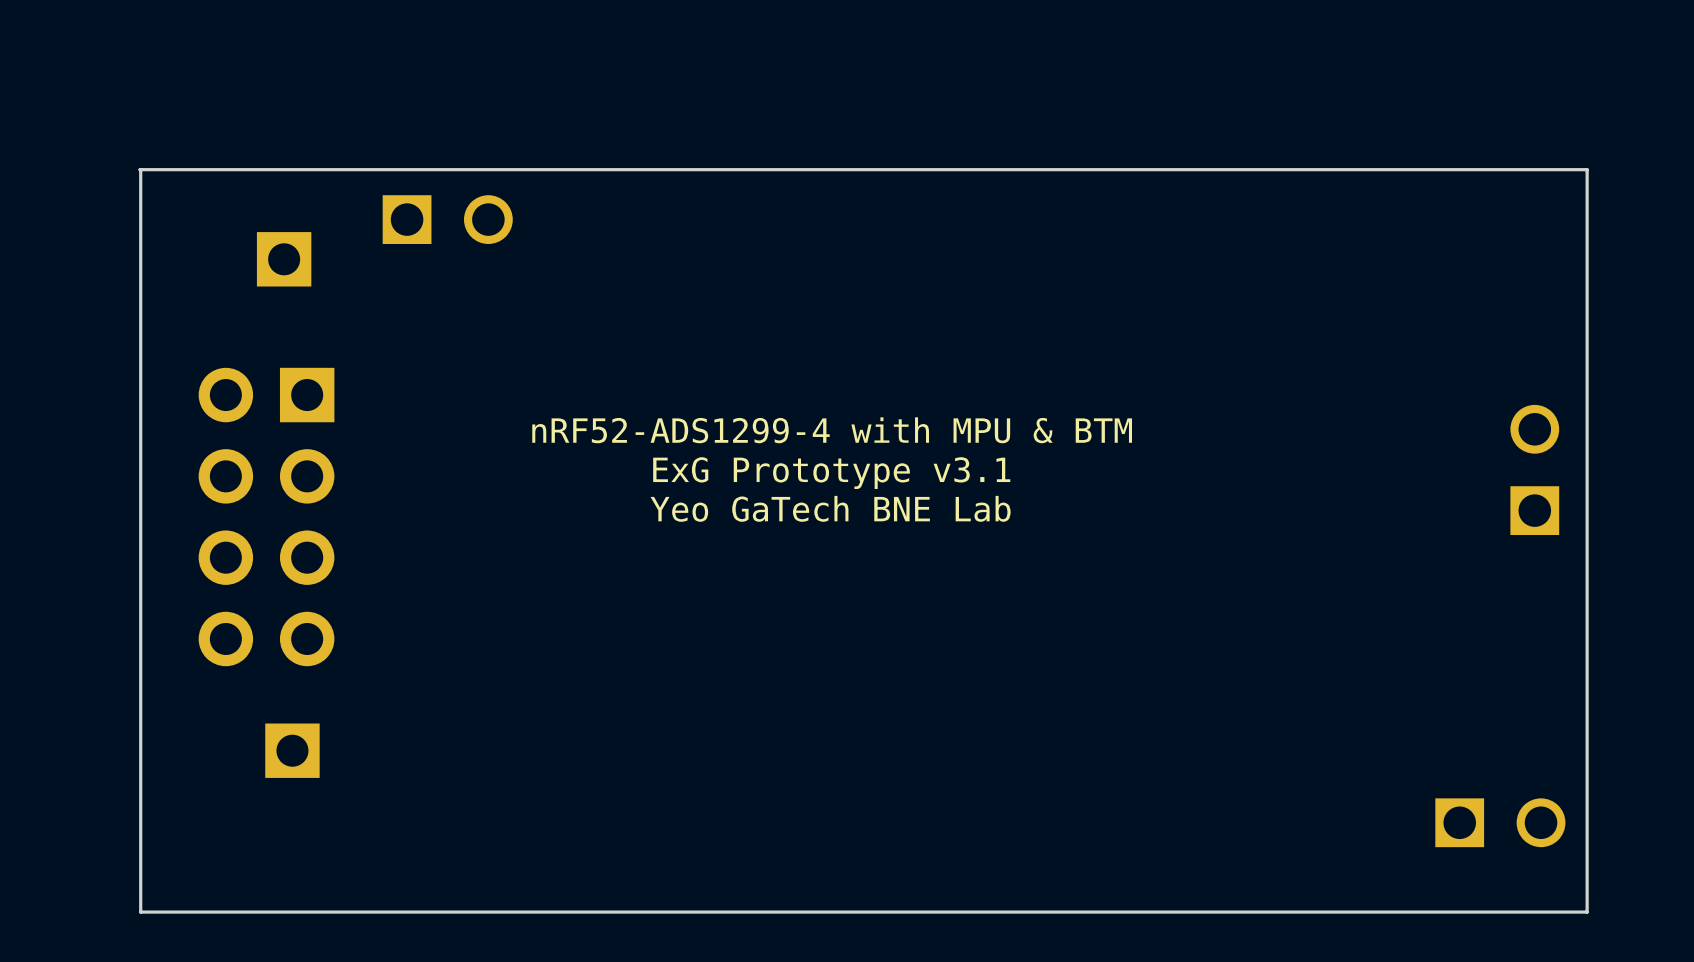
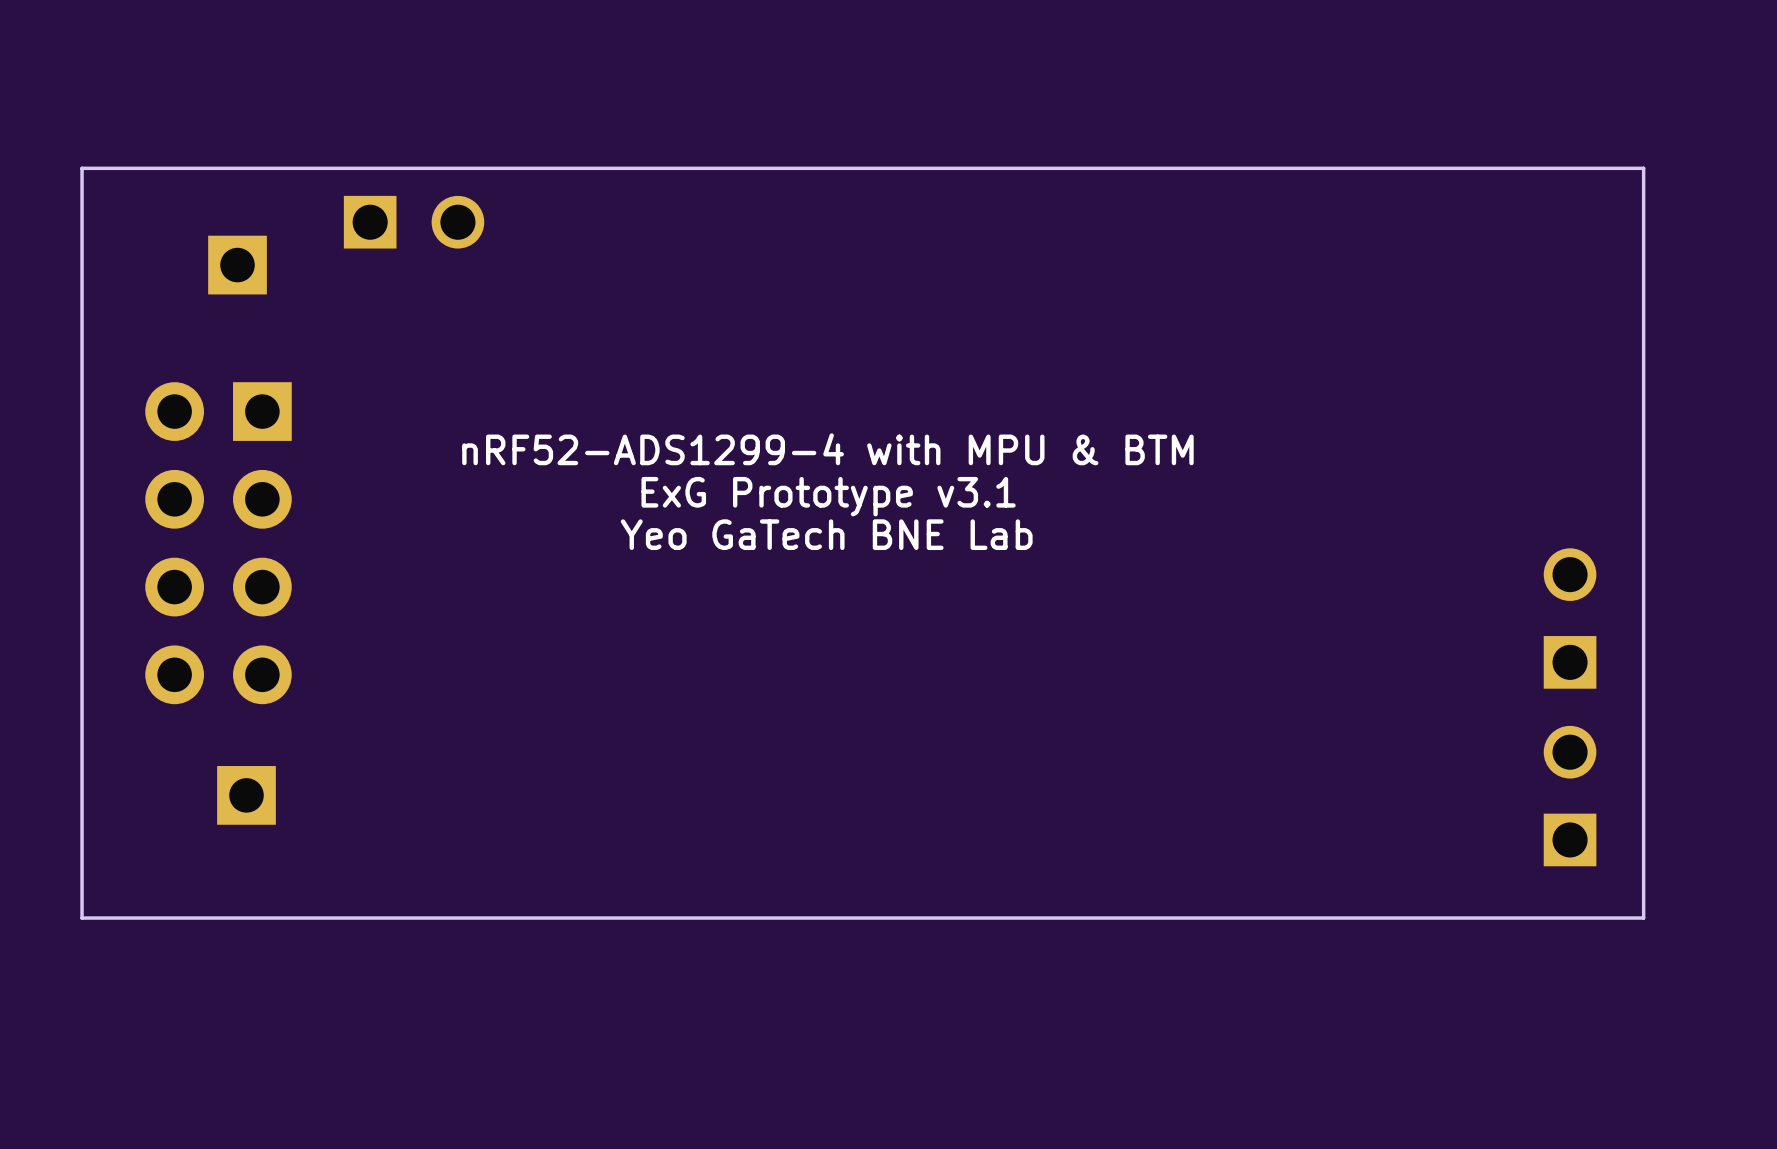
board edge: (140, 169) (140, 912) (1587, 912) (1587, 864) -> (82, 168) (82, 918) (1643, 918)
part position: (1534, 469) -> (1570, 618)
part rotation: 0° (1500, 822) -> 90° counterclockwise (1570, 796)

